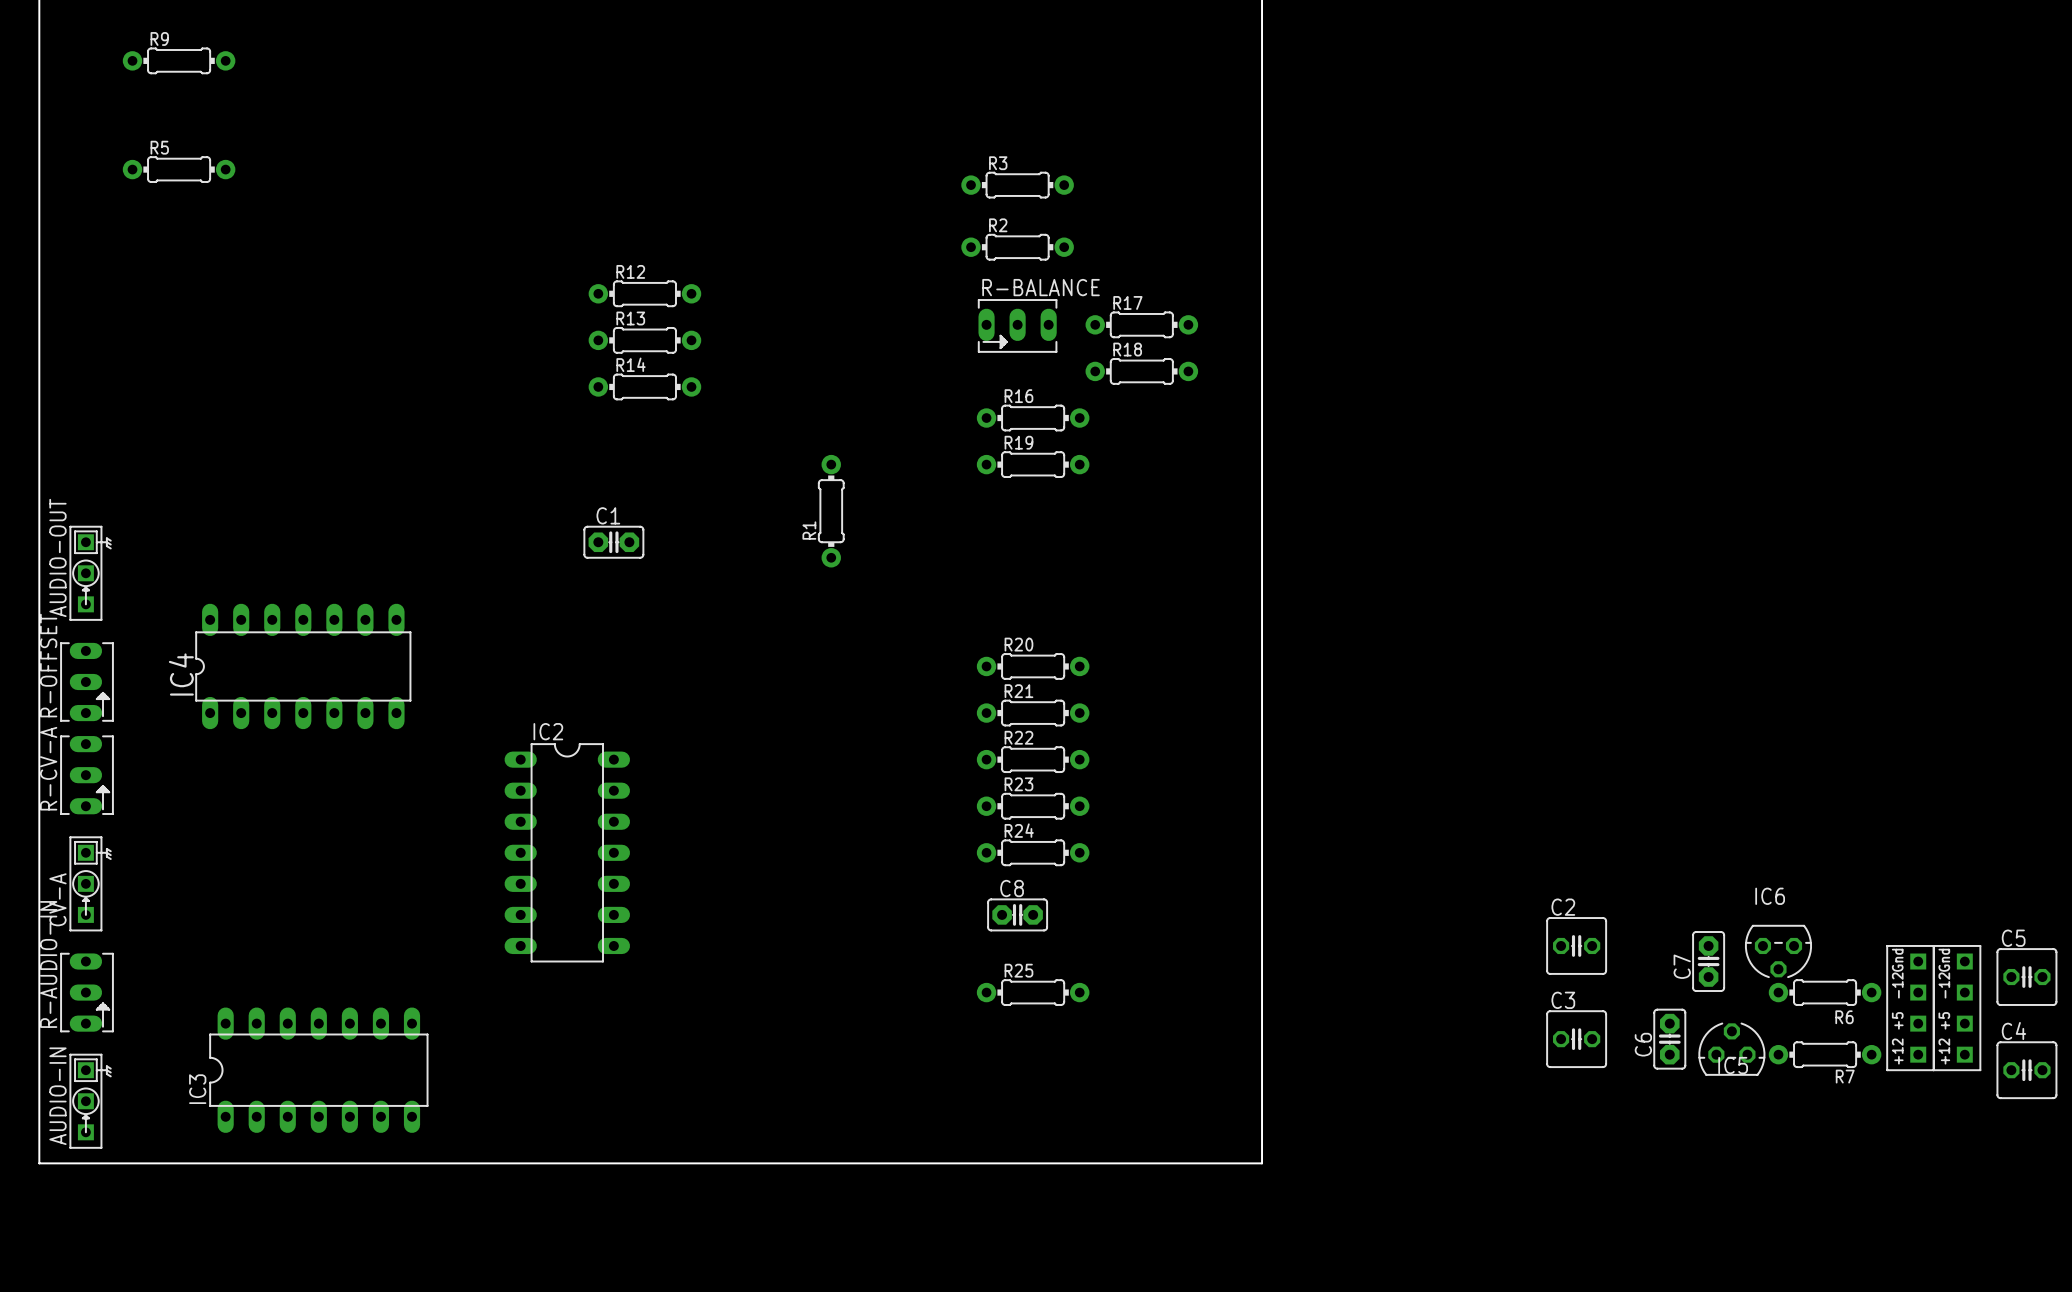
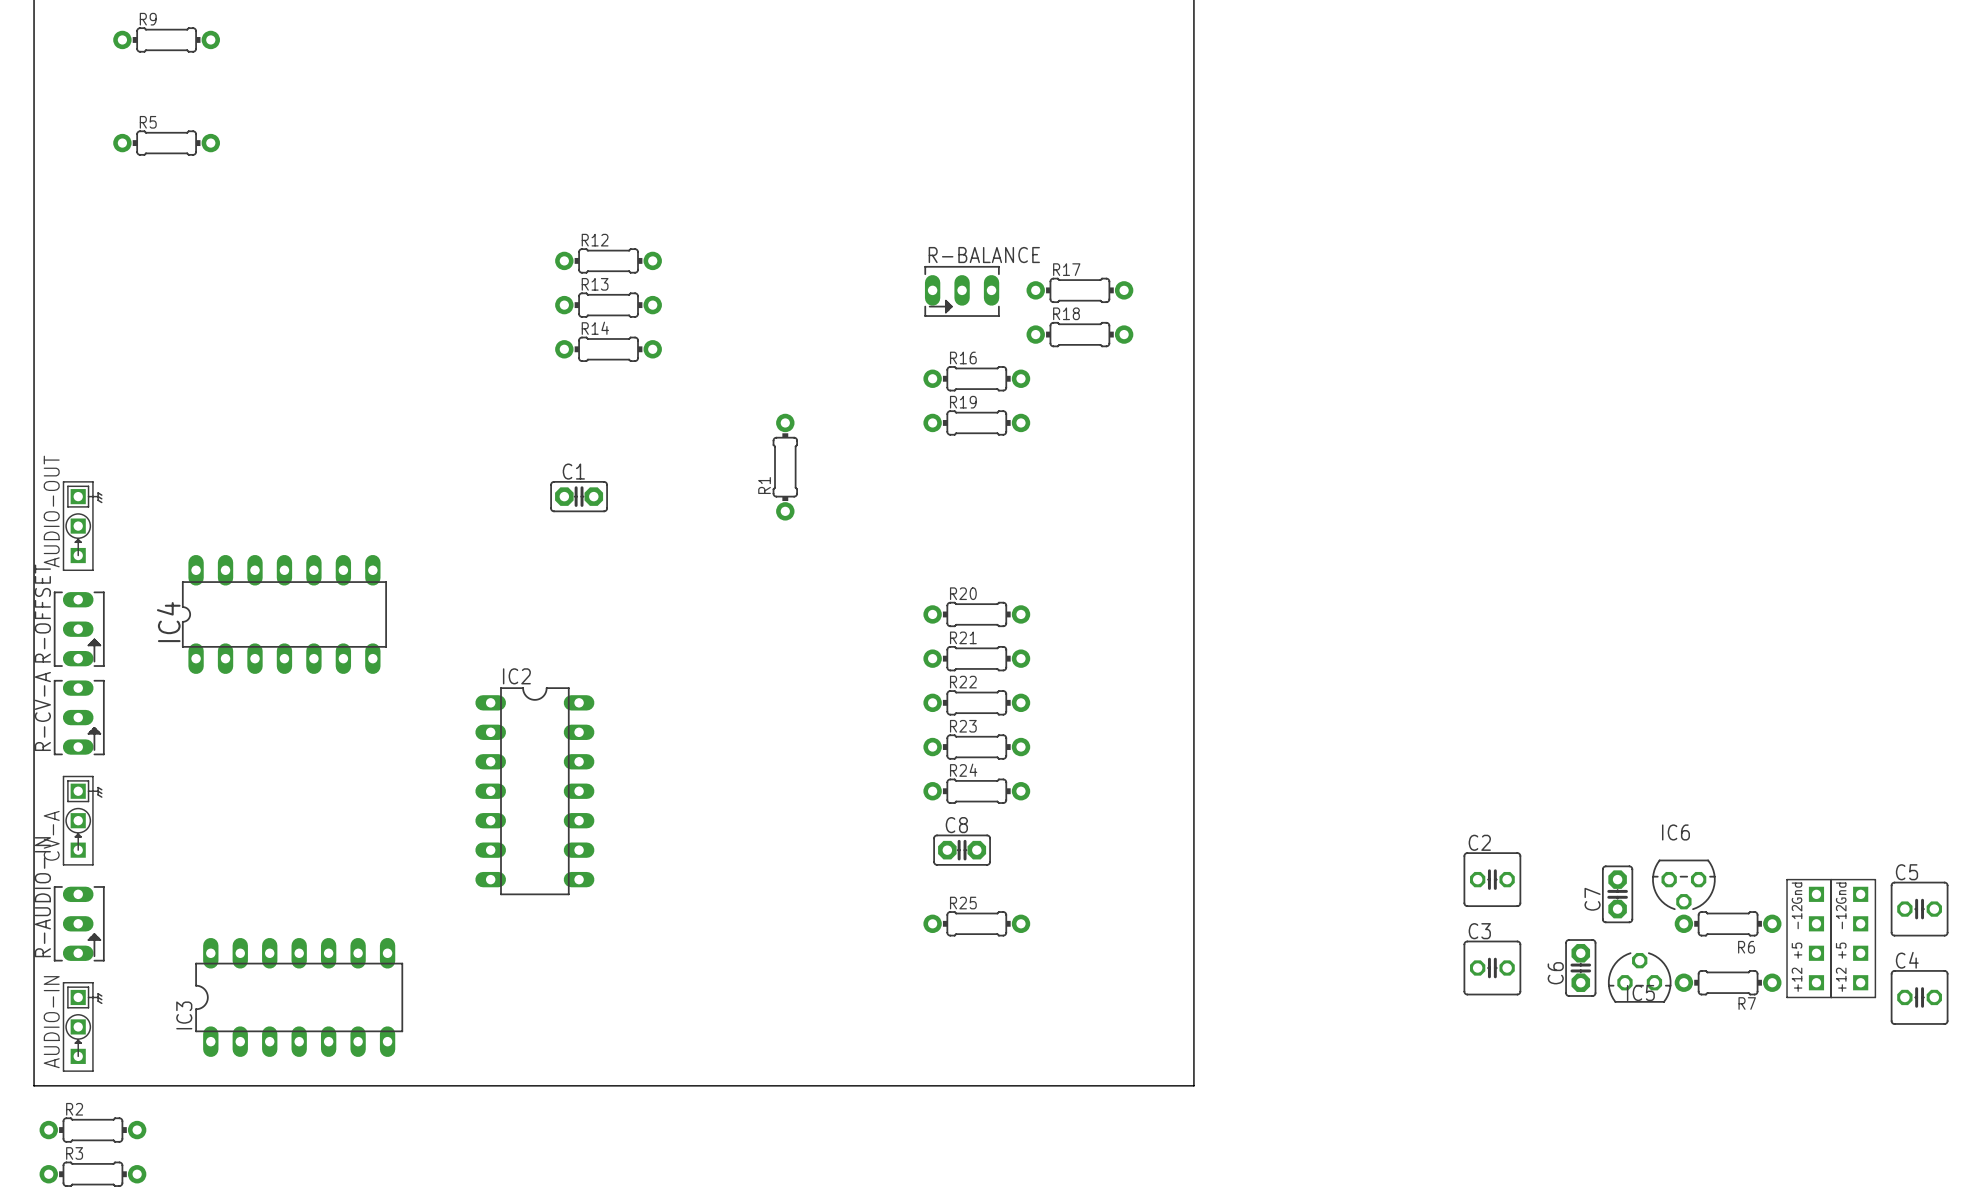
R3 position: (1017, 185) -> (92, 1174)
R2 position: (1017, 247) -> (92, 1130)

